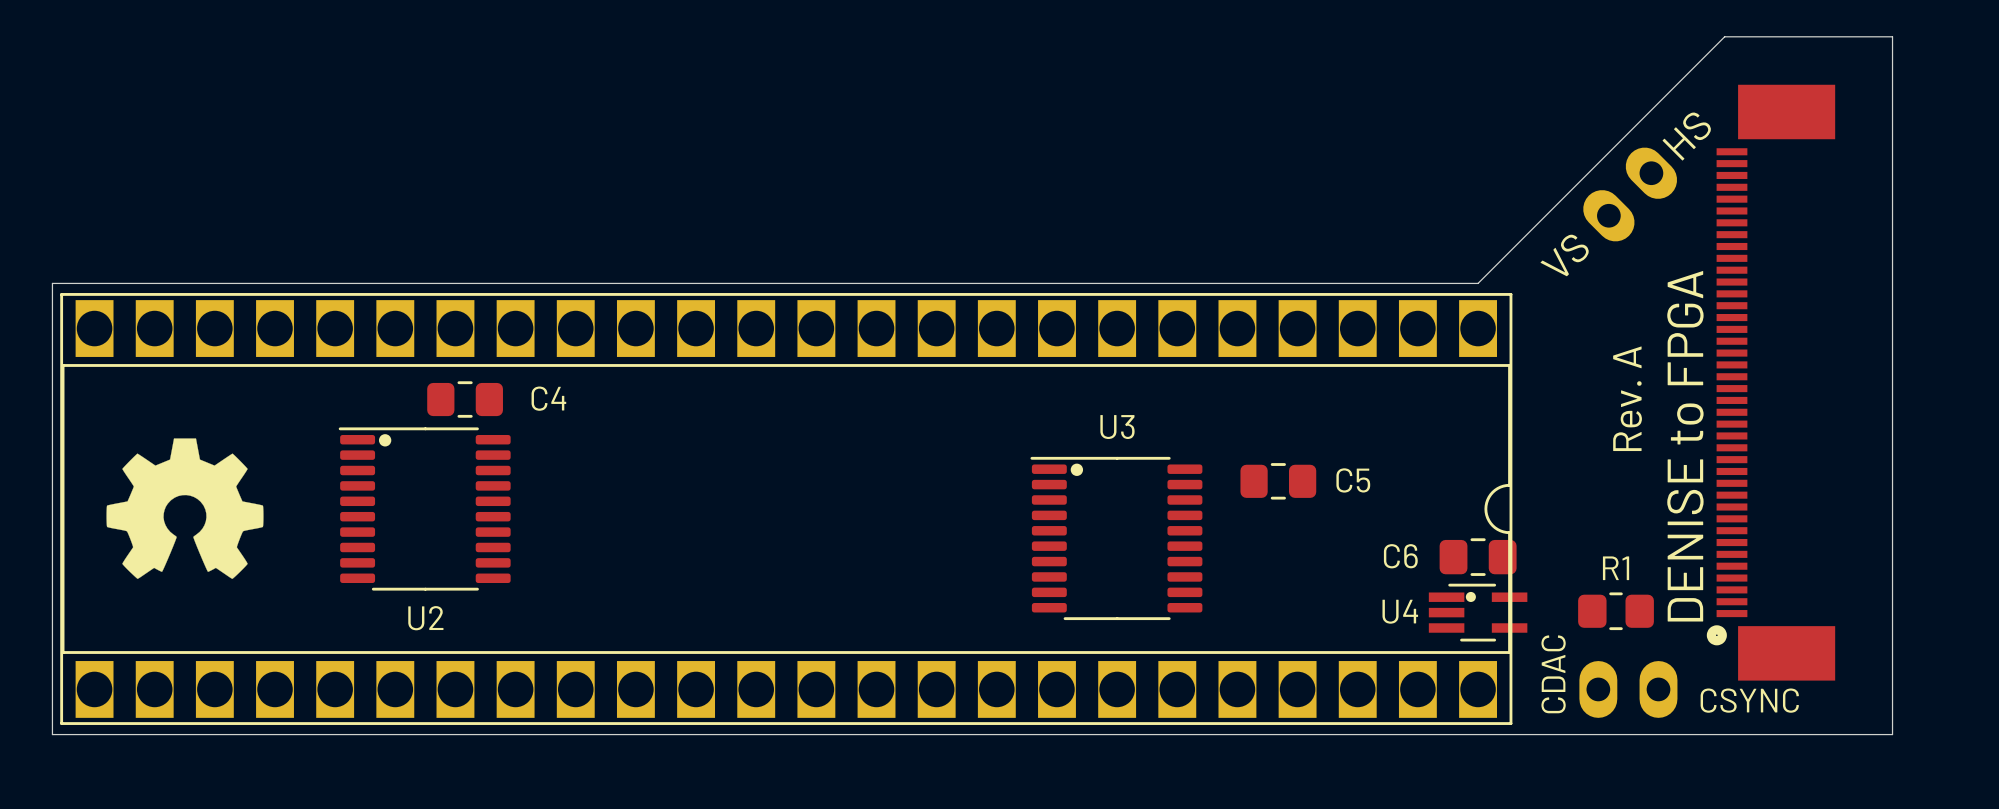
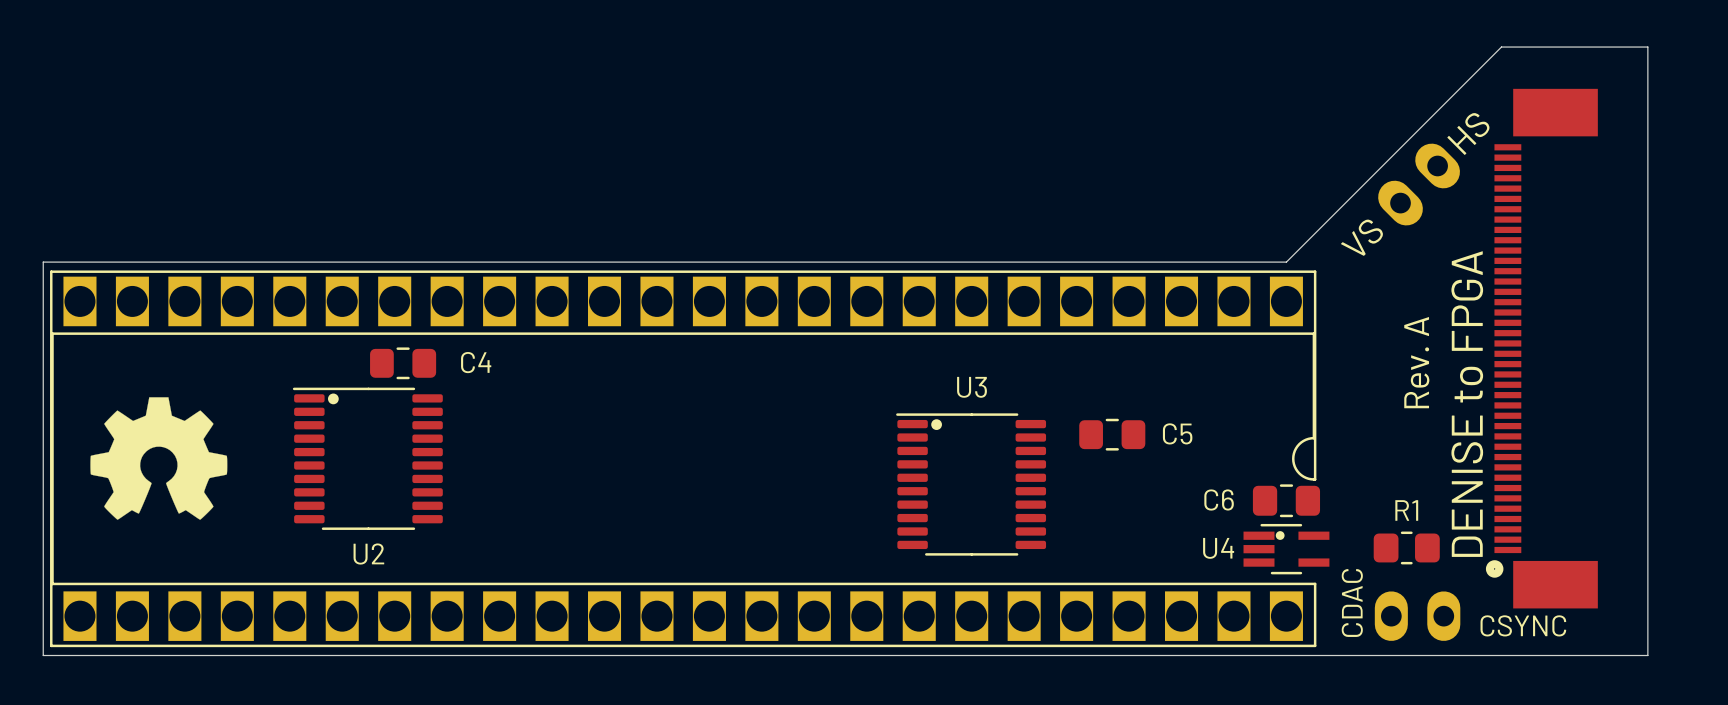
part footprint: [60, 293, 1513, 725] -> [50, 270, 1317, 648]

